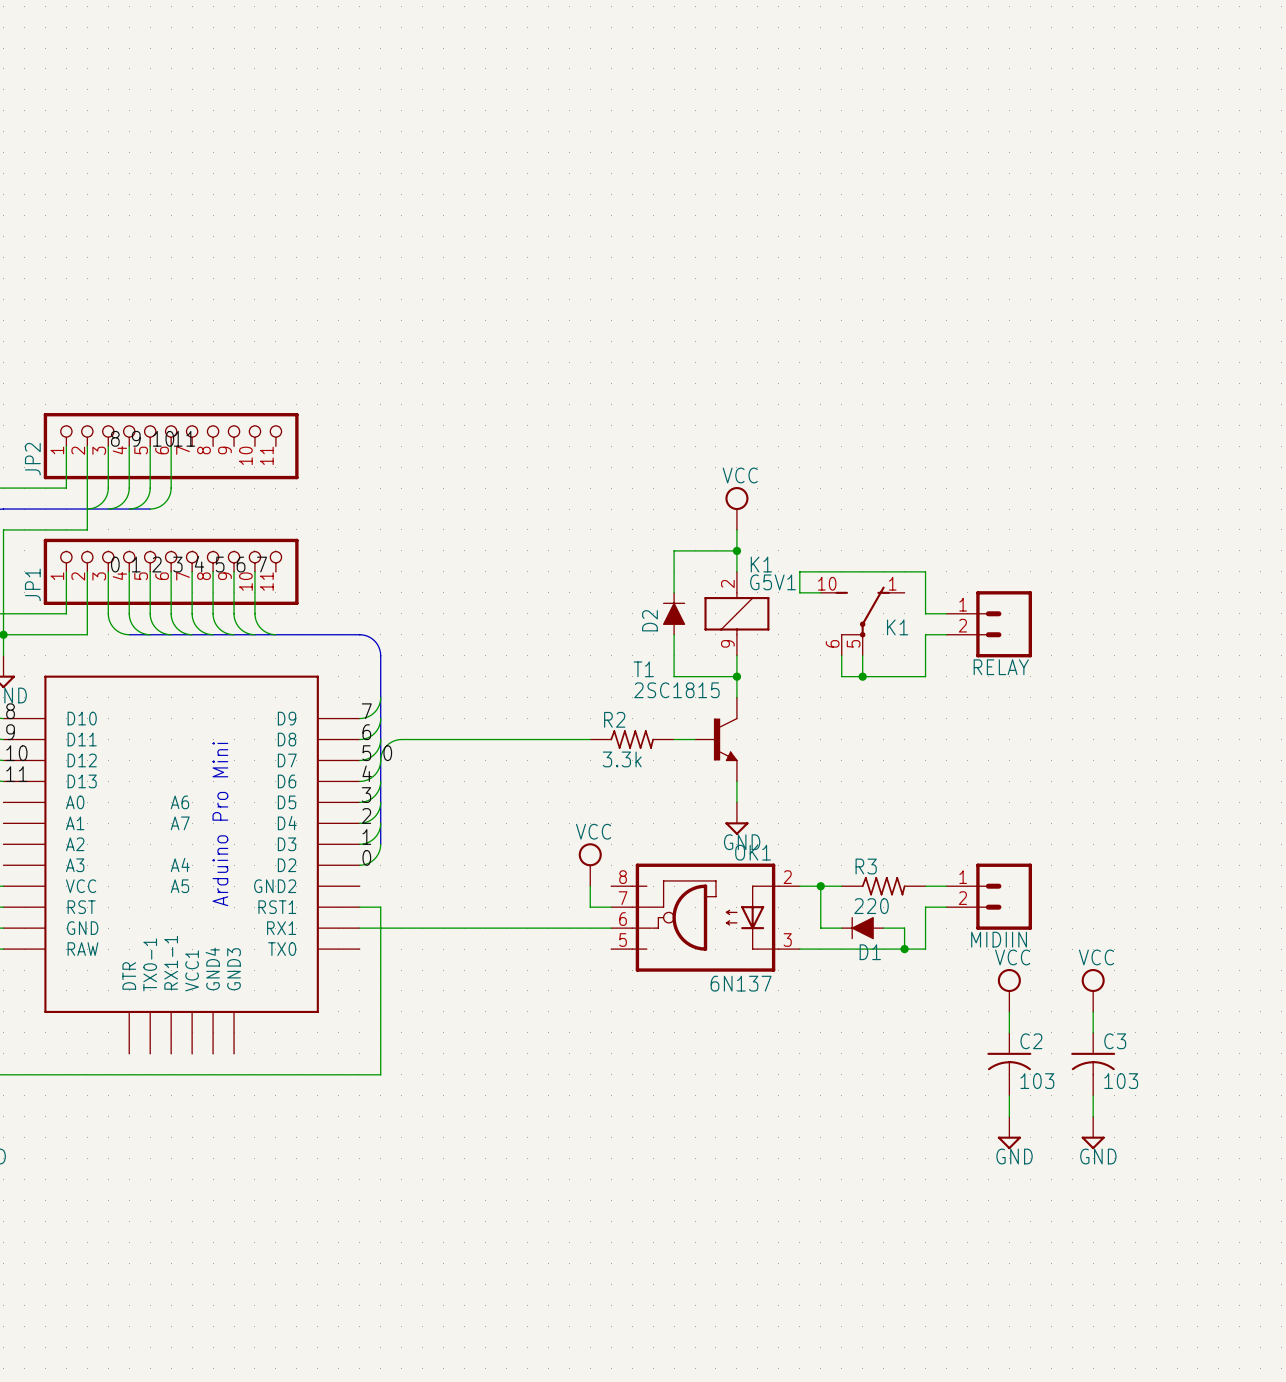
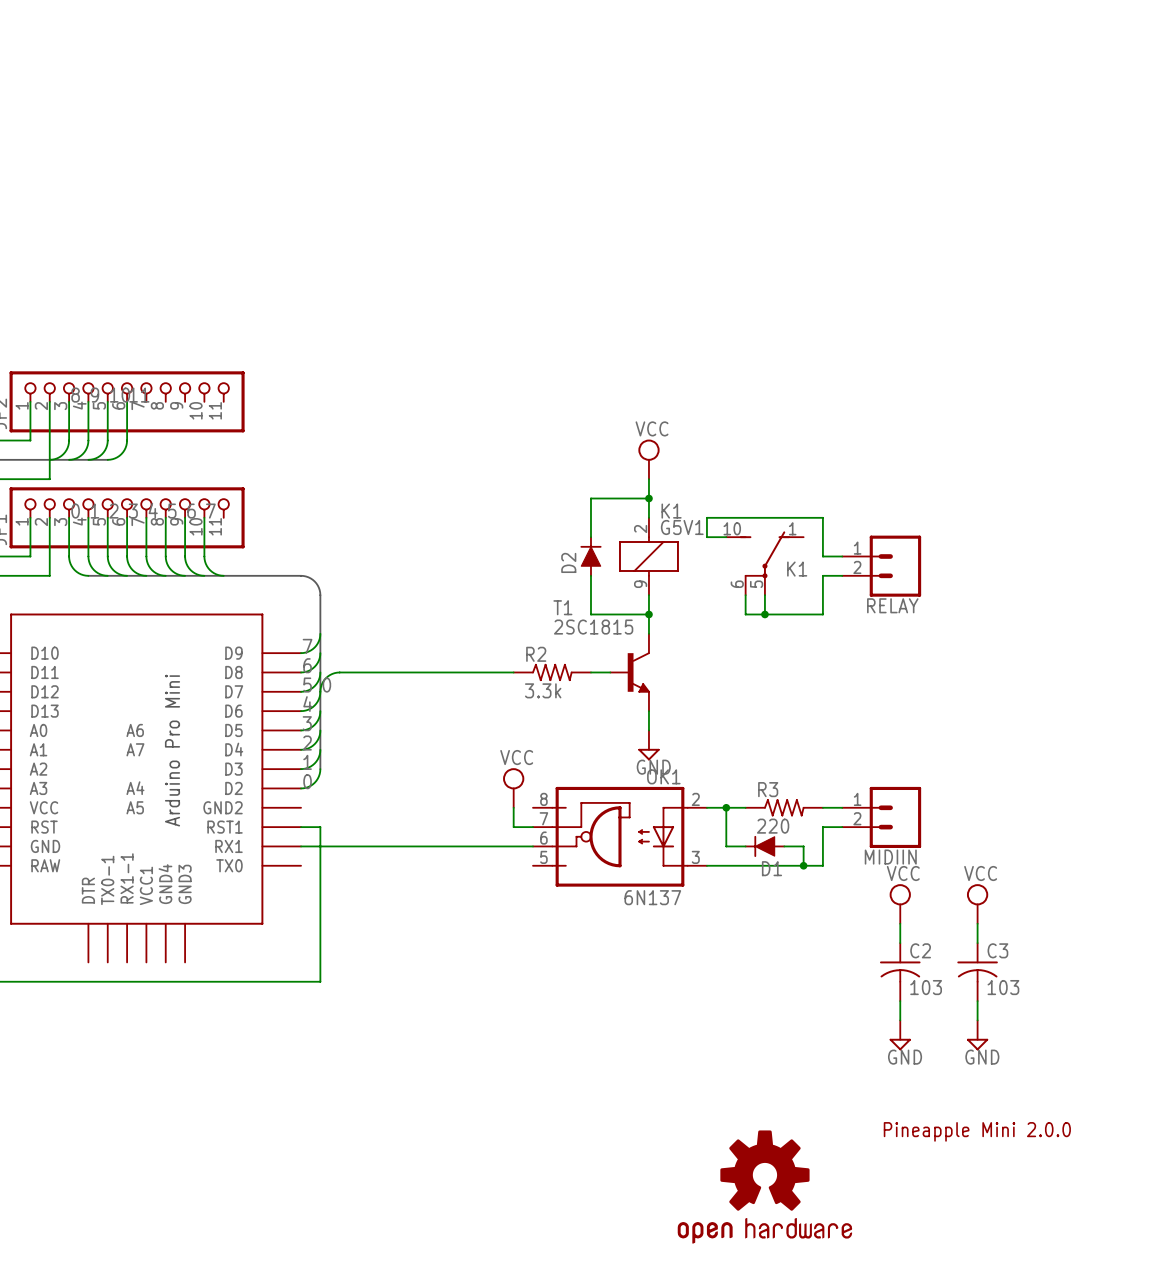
text: none -> Pineapple Mini 2.0.0 (977, 1131)
part: none -> (764, 1187)

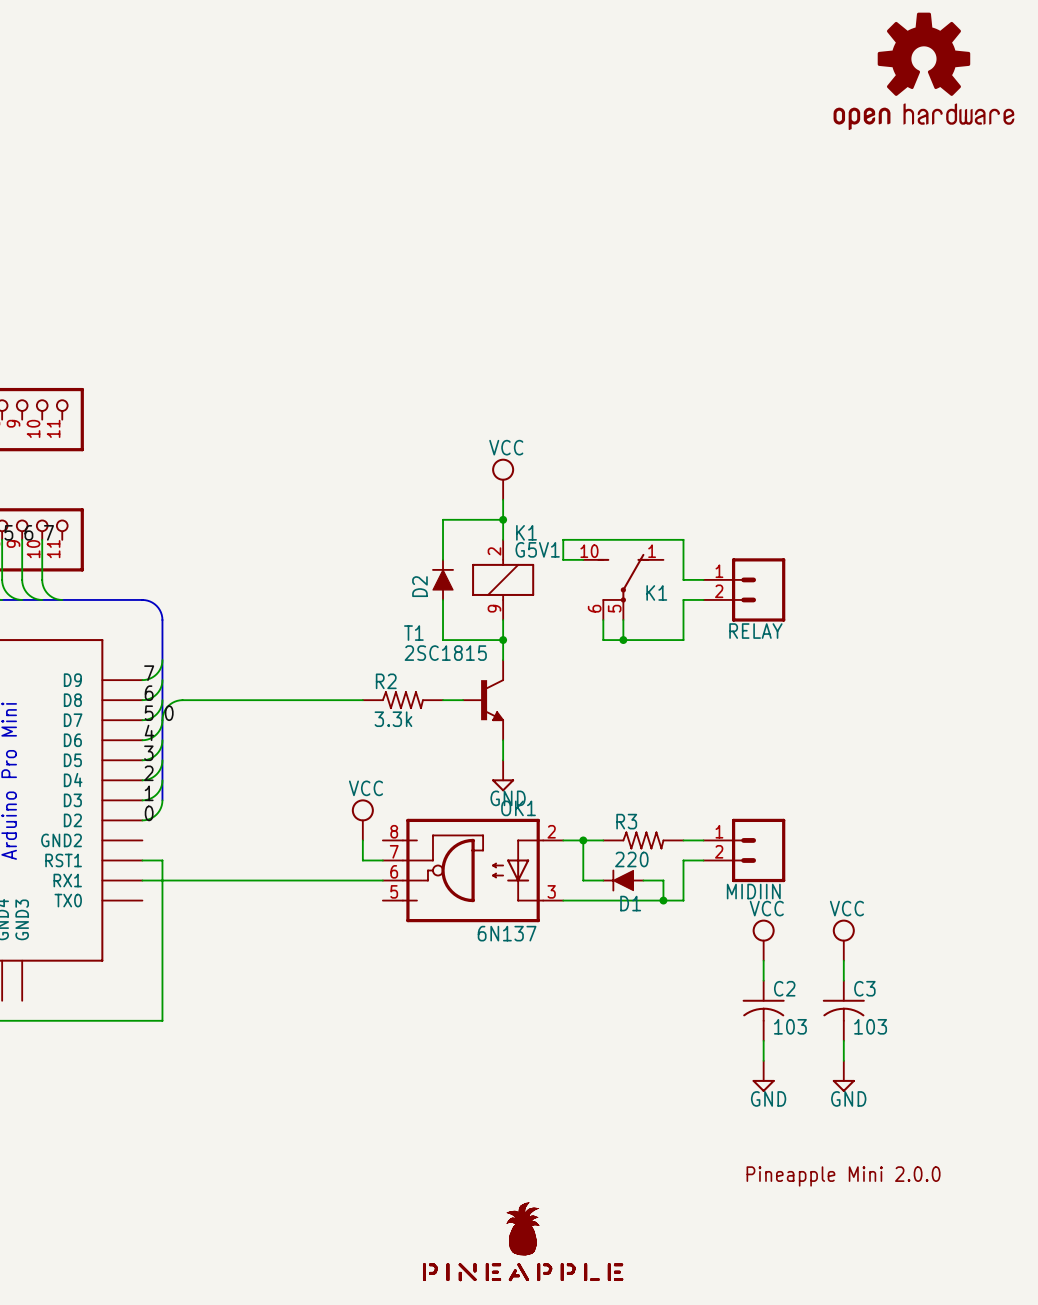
part: none -> (923, 71)
part: (764, 1187) -> none
part: none -> (523, 1241)

